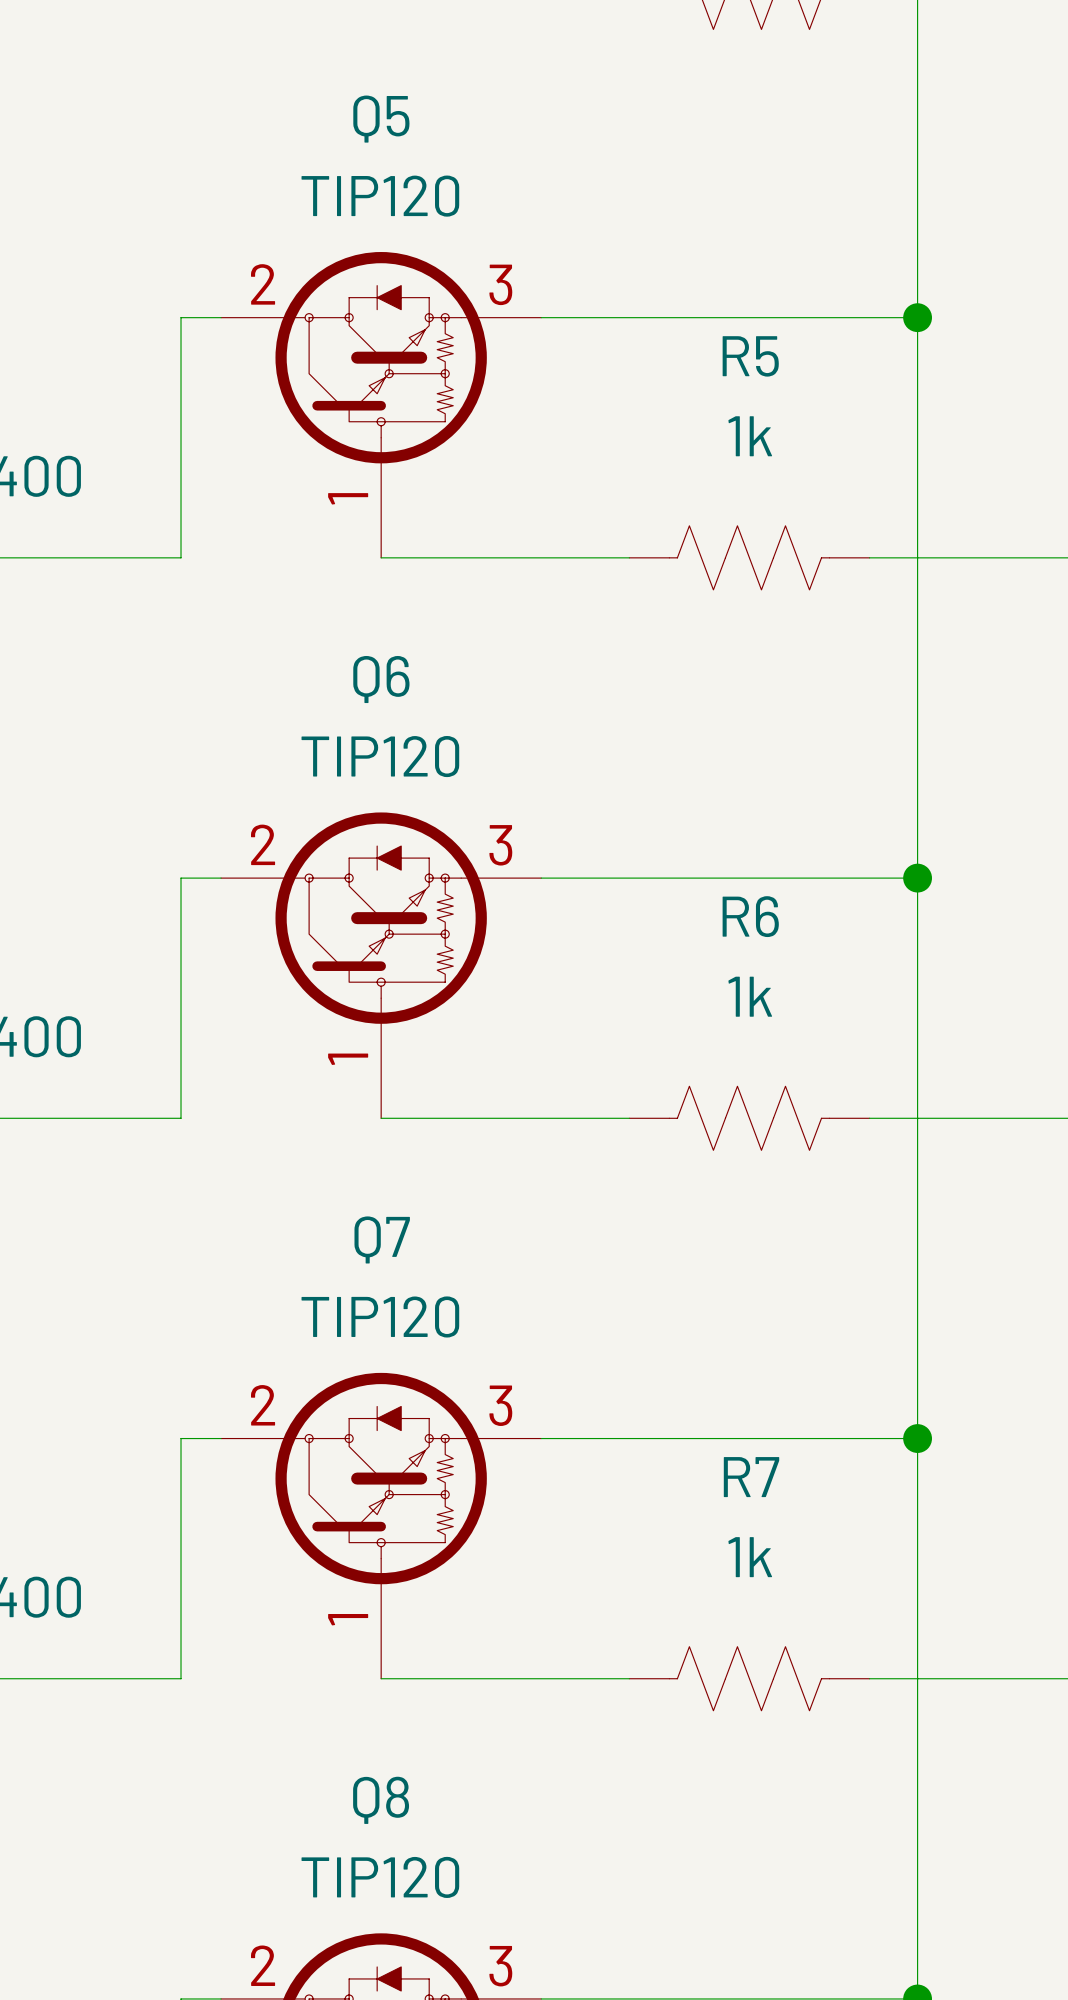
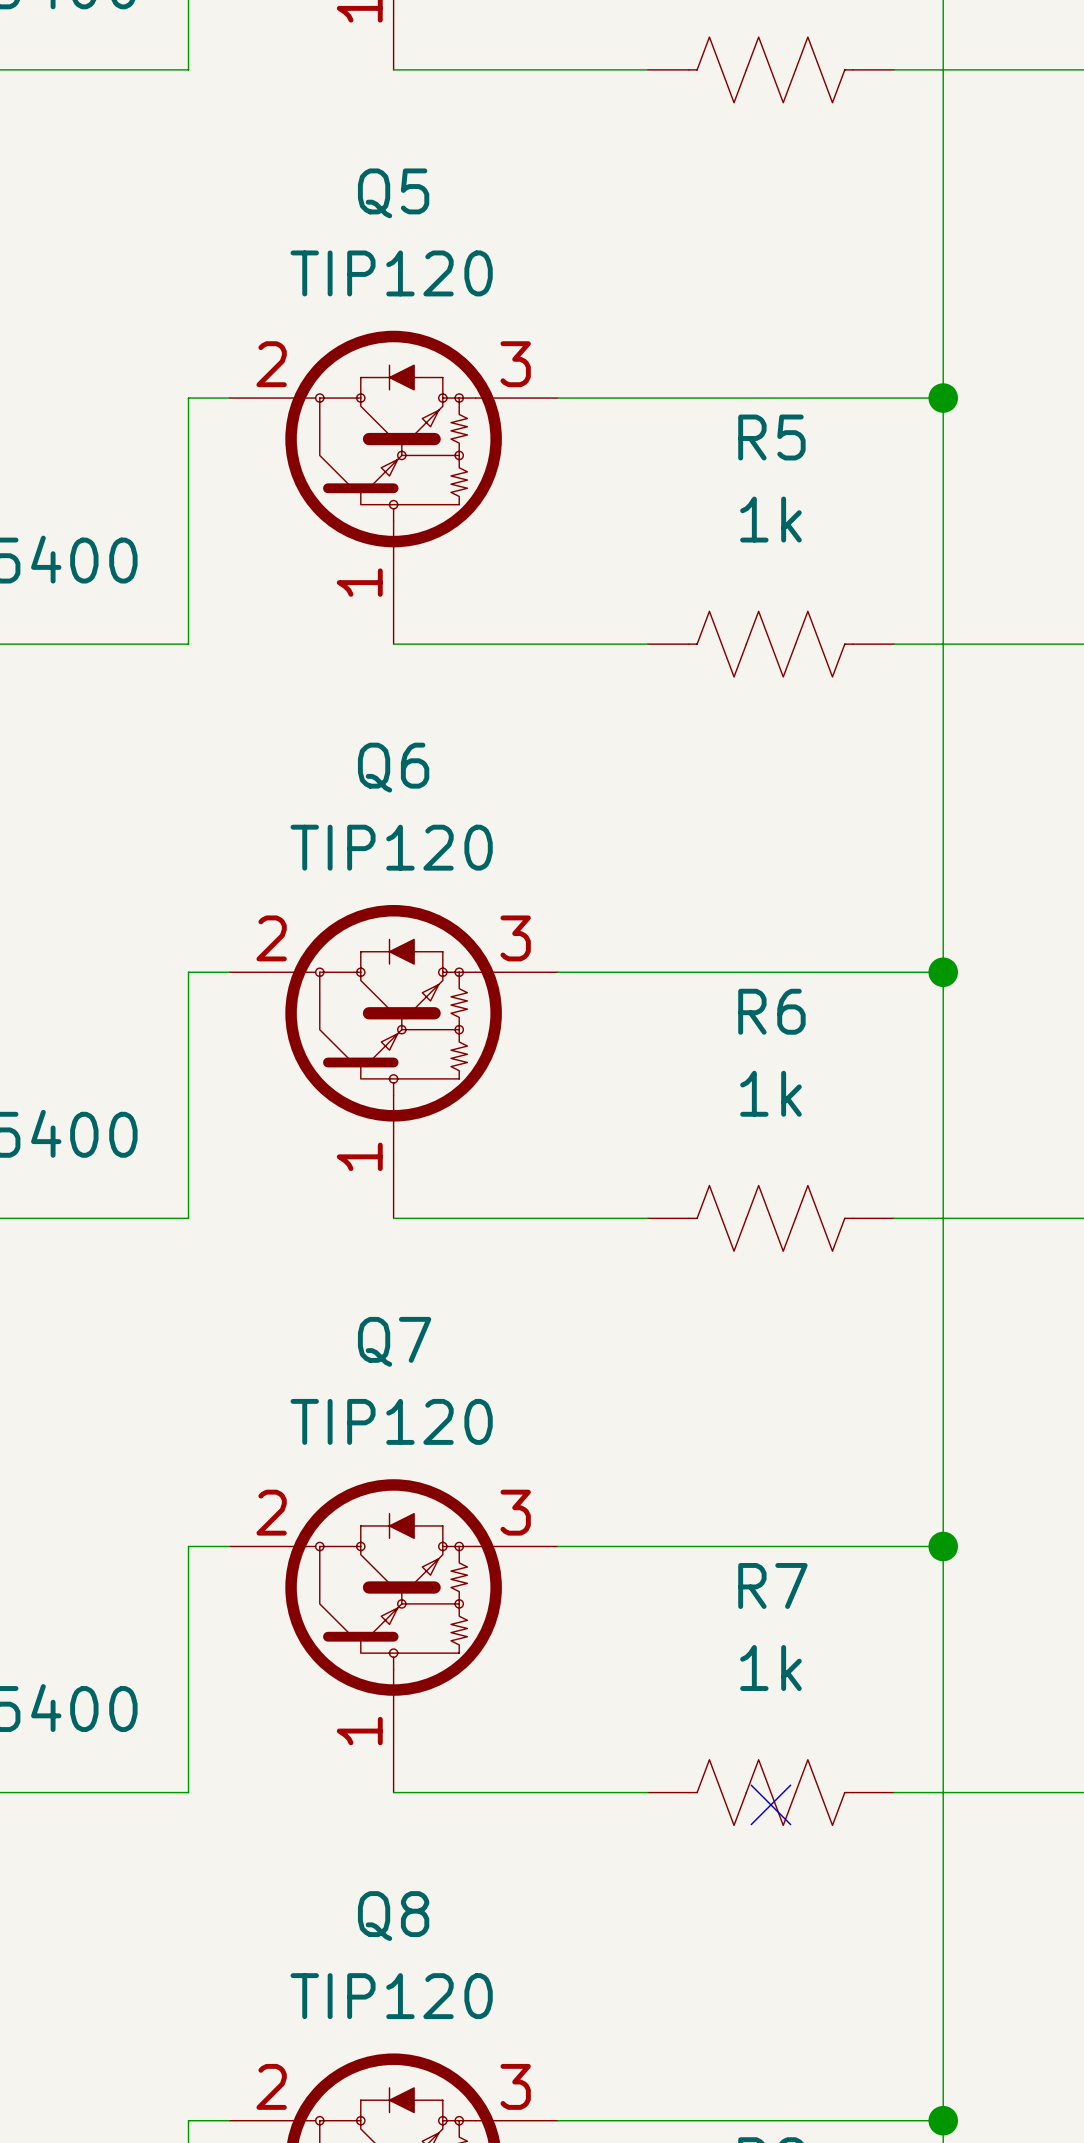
no-connect mark: none -> (770, 1804)

